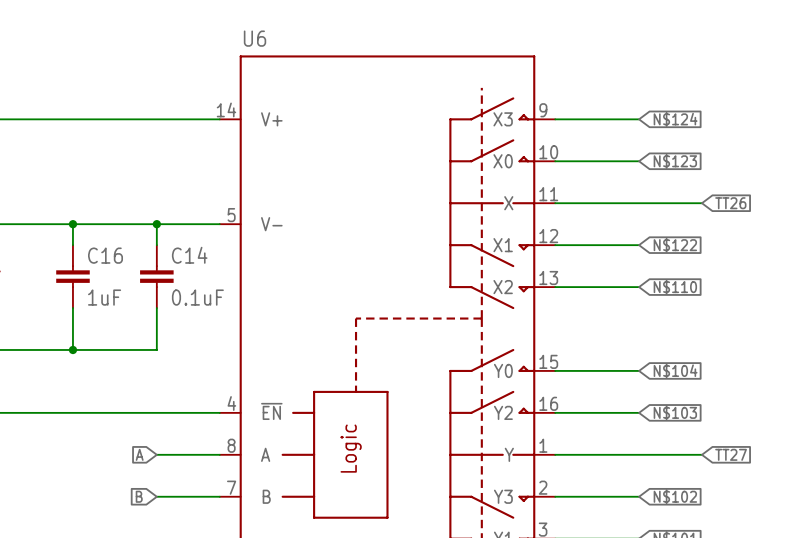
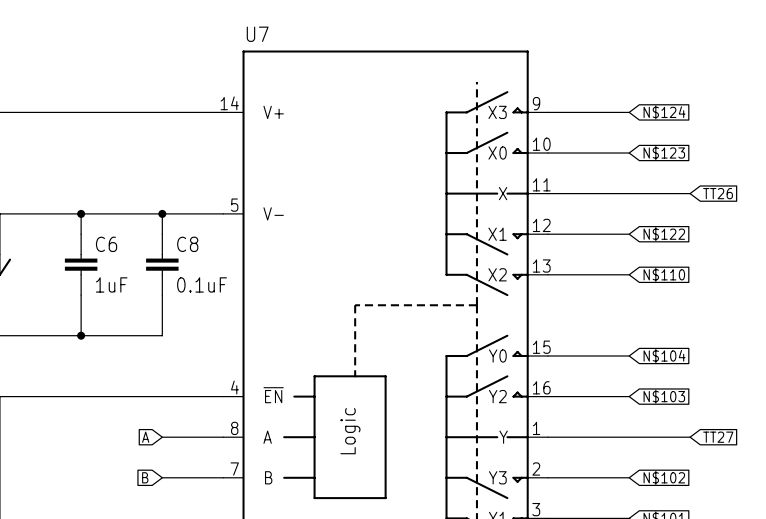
U6 name: U6 (255, 38) -> U7 (257, 34)
C16 name: C16 (105, 255) -> C6 (106, 244)
C14 name: C14 (189, 255) -> C8 (187, 244)

